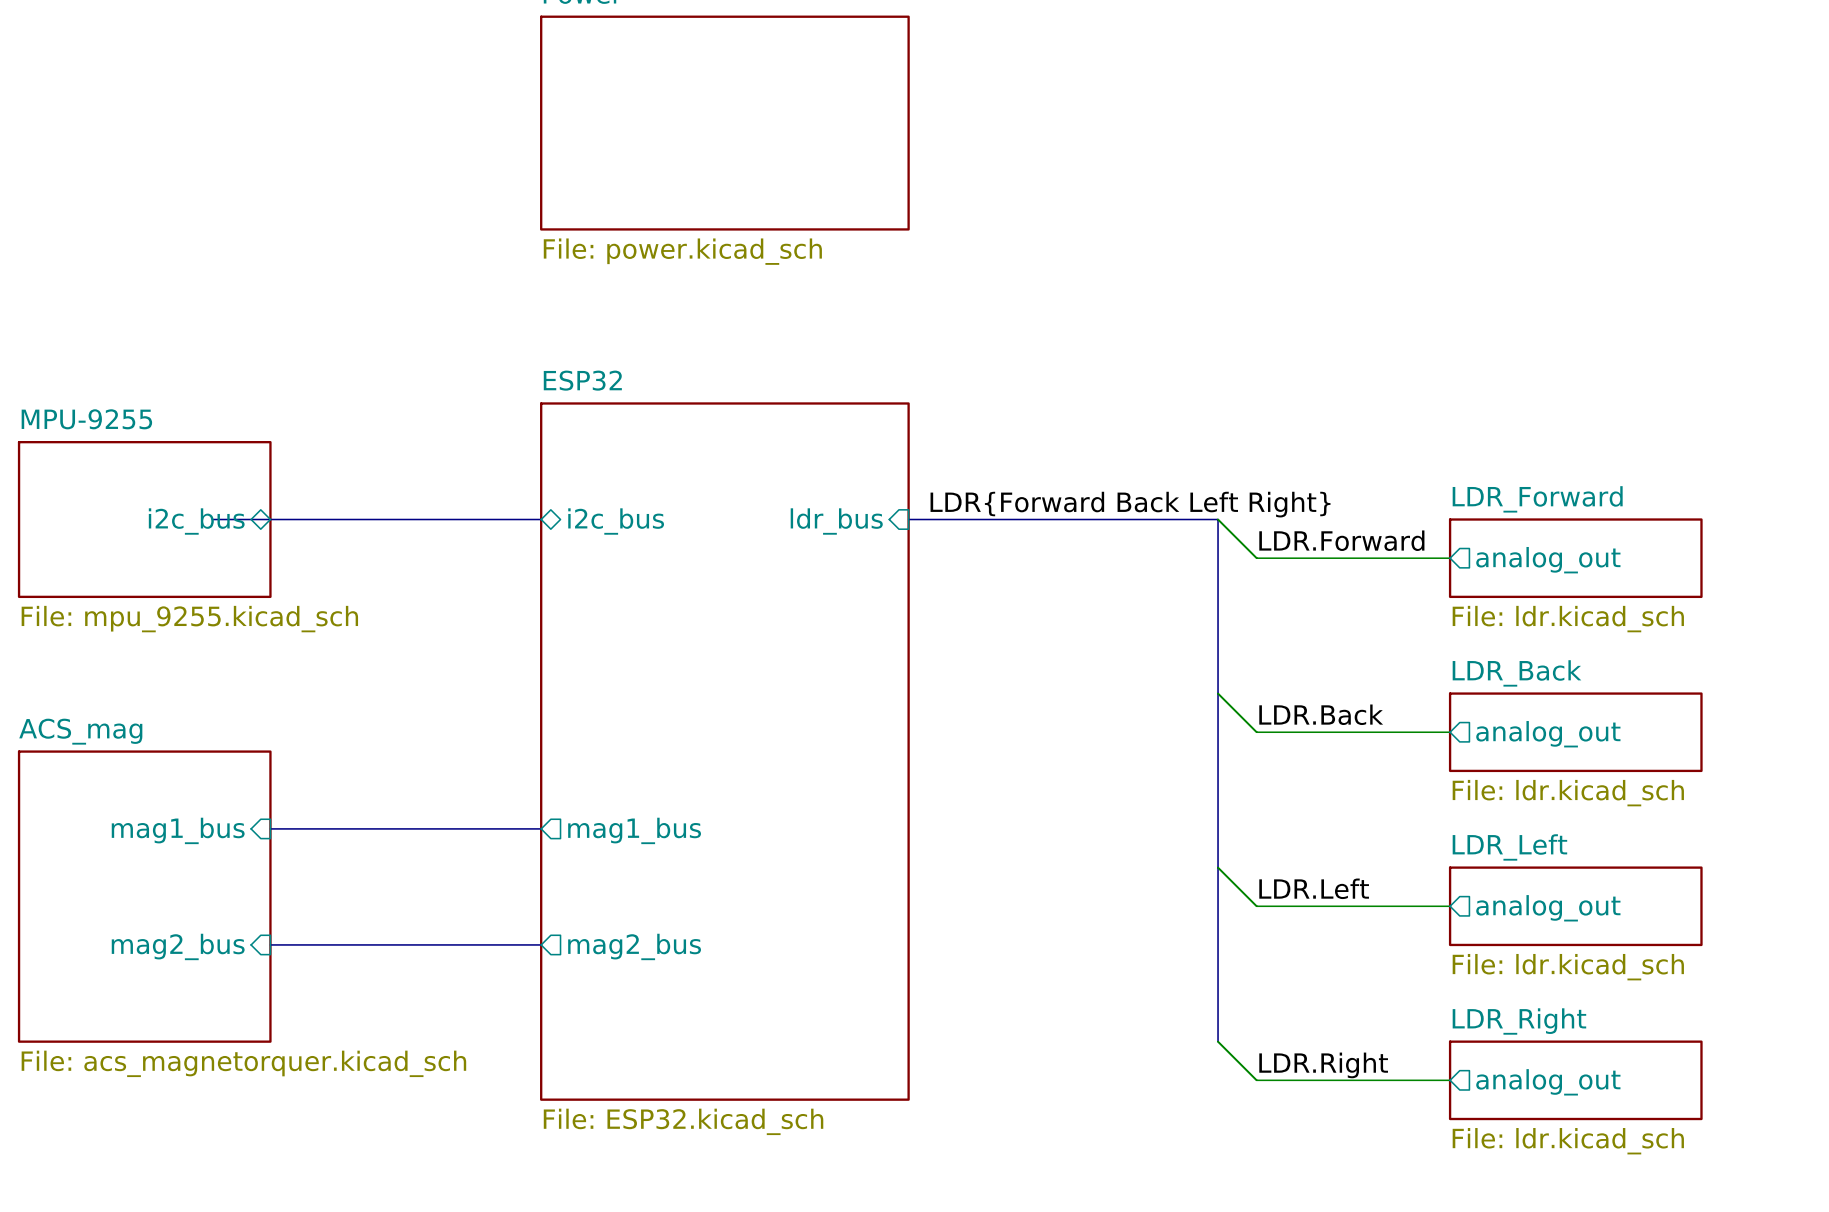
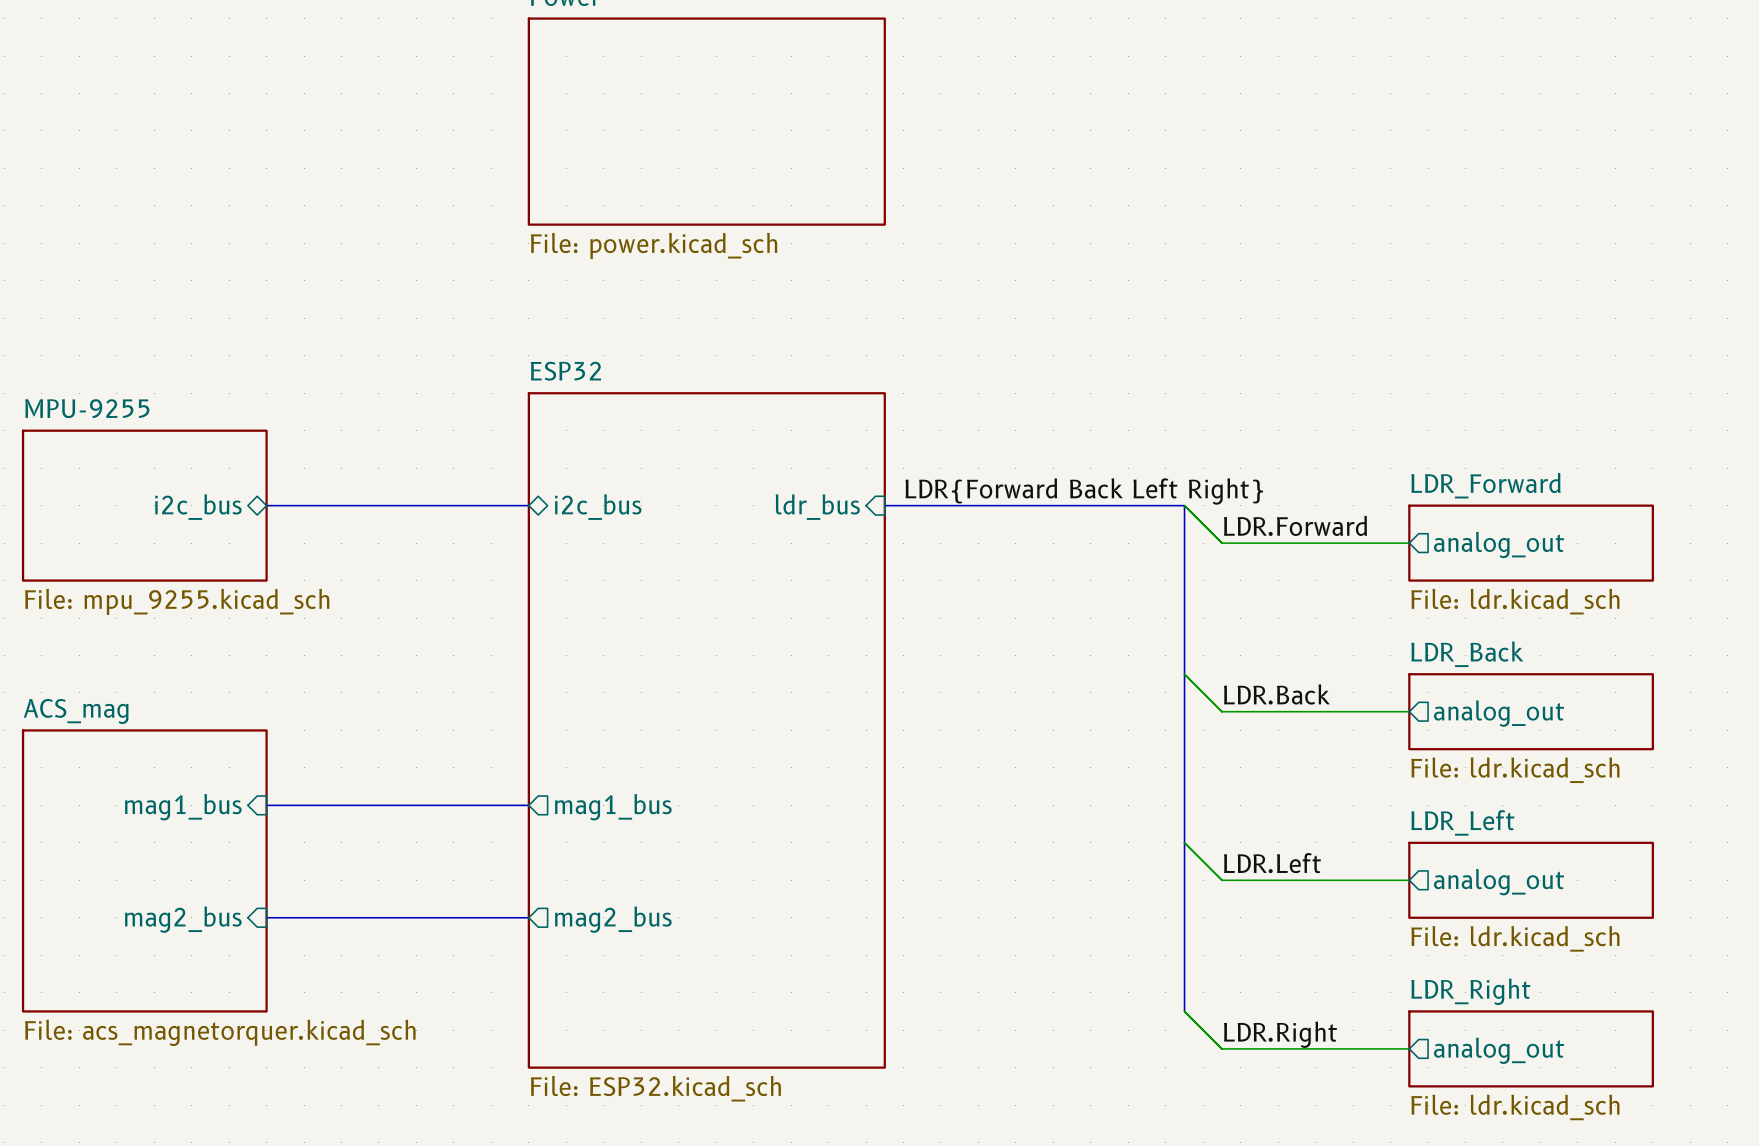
bus: (212, 519) (270, 519) -> none

